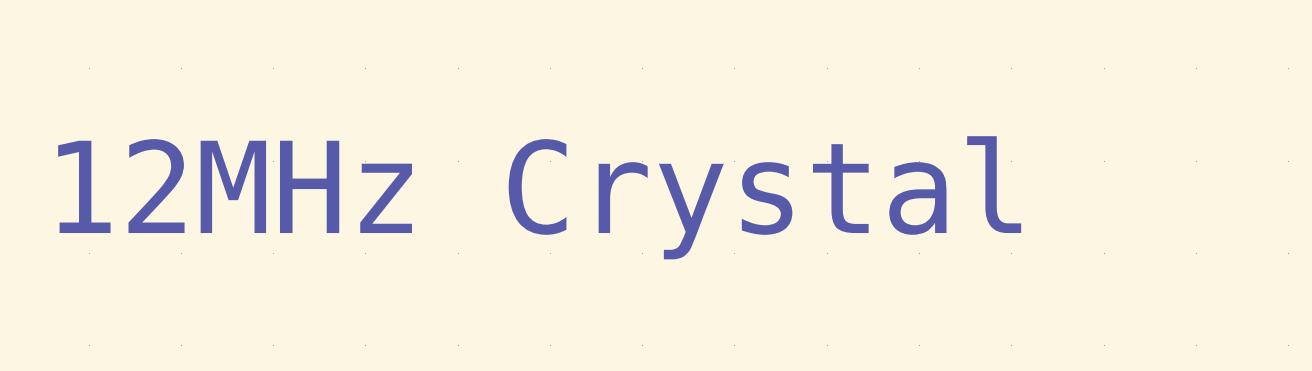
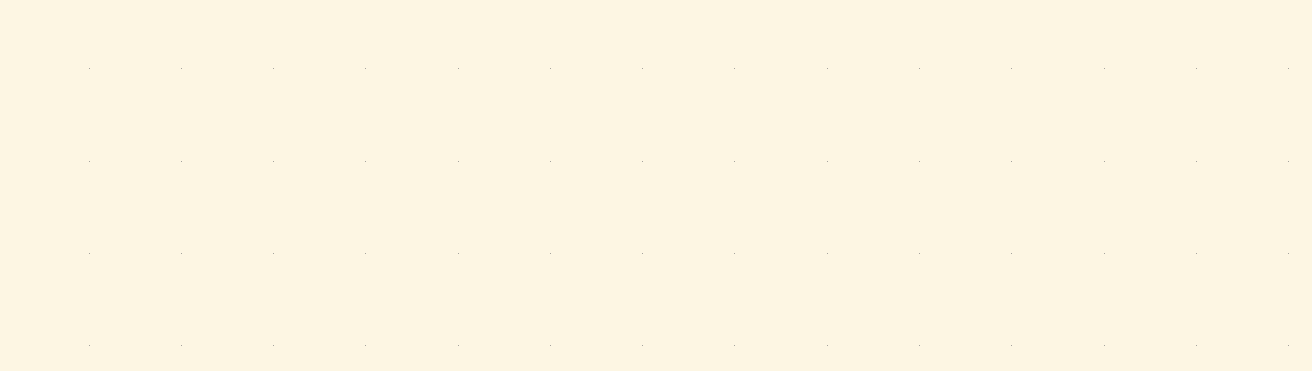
text: 12MHz Crystal (539, 197) -> none

